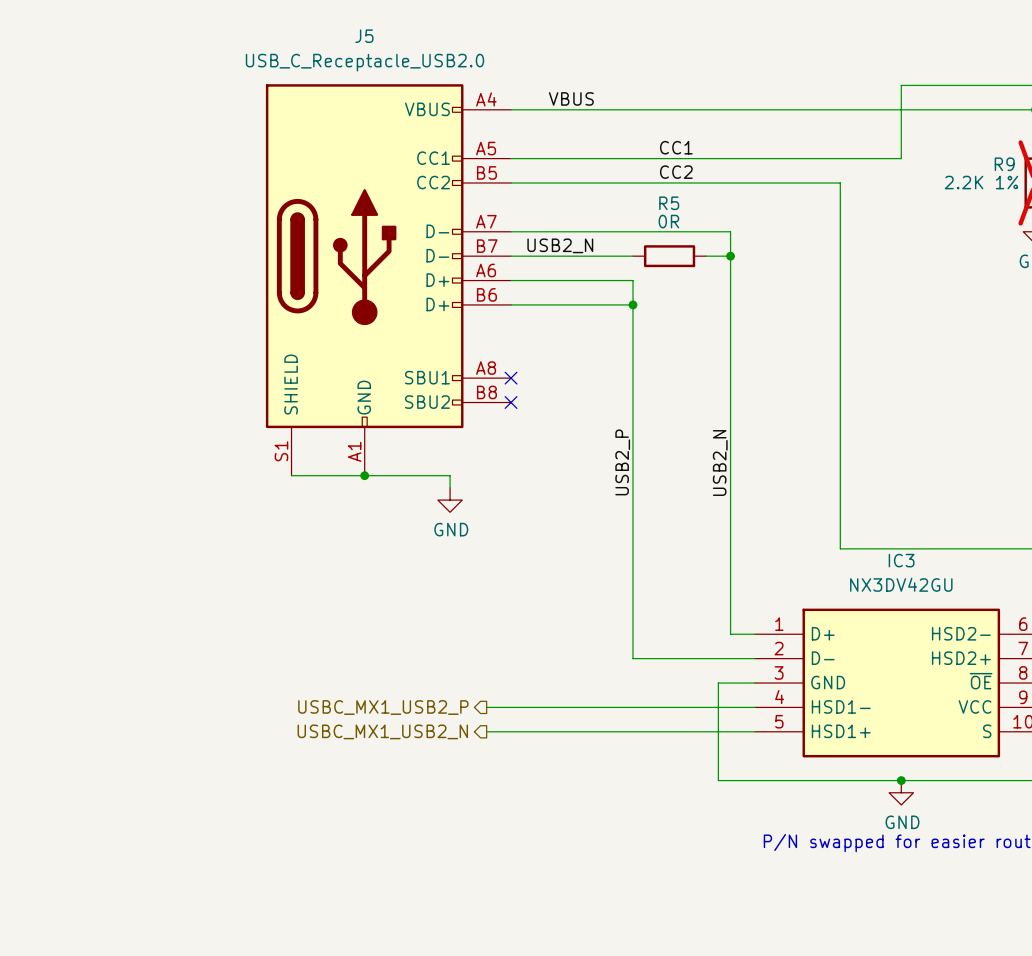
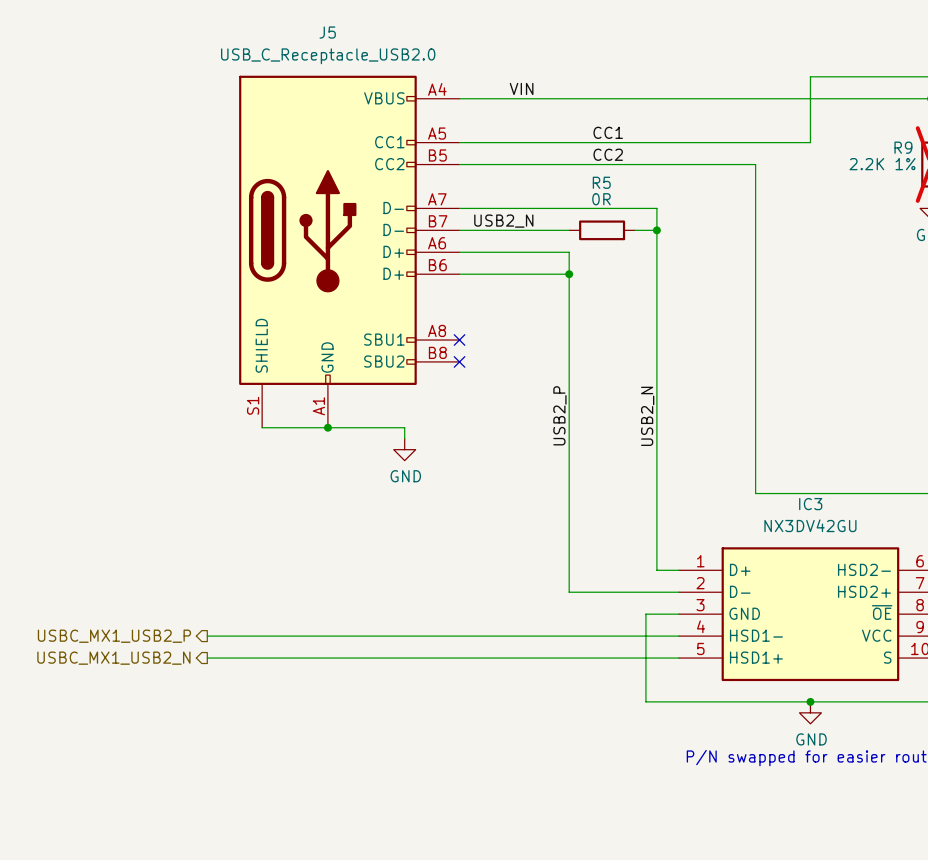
label: VBUS (571, 98) -> VIN (521, 88)
hierarchical label: none -> USBC_MX1_USB2_P (114, 636)
wire: none -> (207, 636) (437, 636)
hierarchical label: USBC_MX1_USB2_P (383, 707) -> none
hierarchical label: none -> USBC_MX1_USB2_N (113, 658)
wire: none -> (207, 658) (437, 658)
hierarchical label: USBC_MX1_USB2_N (382, 731) -> none

